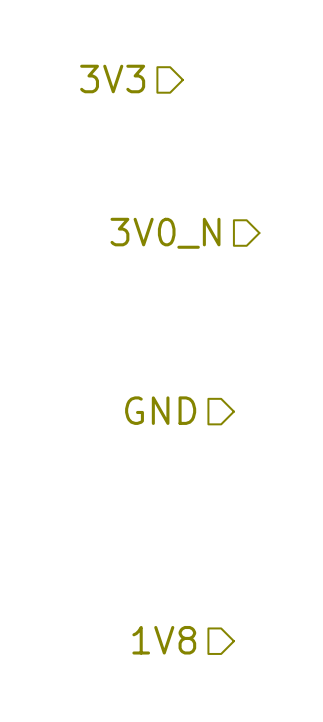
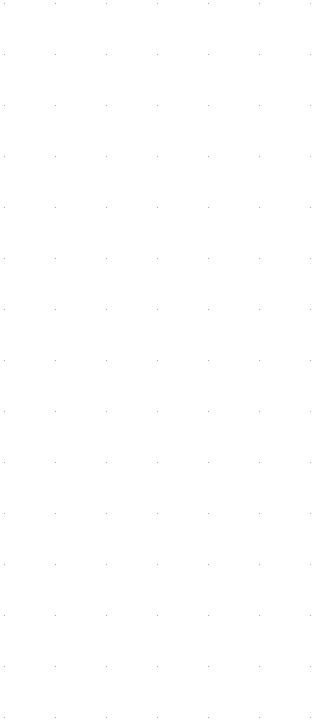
hierarchical label: 3V3 (112, 79) -> none
hierarchical label: 3V0_N (165, 233) -> none
hierarchical label: GND (160, 410) -> none
hierarchical label: 1V8 (164, 640) -> none

